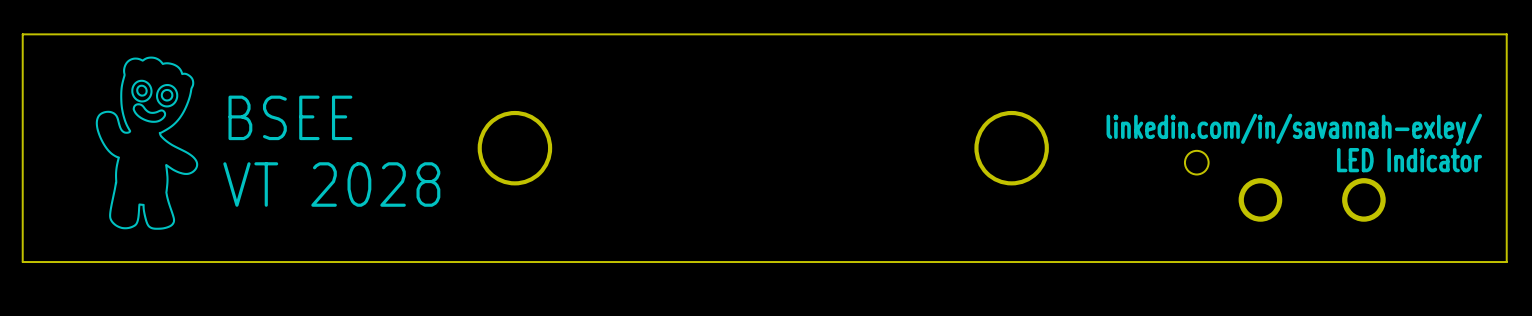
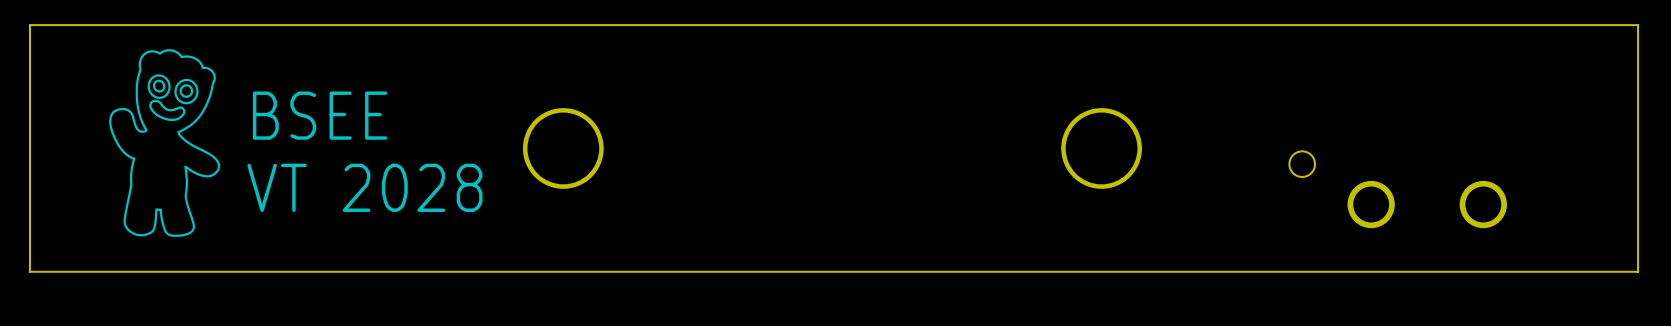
text: linkedin.com/in/savannah-exley/ (1294, 129) -> none
text: LED Indicator (1409, 160) -> none

